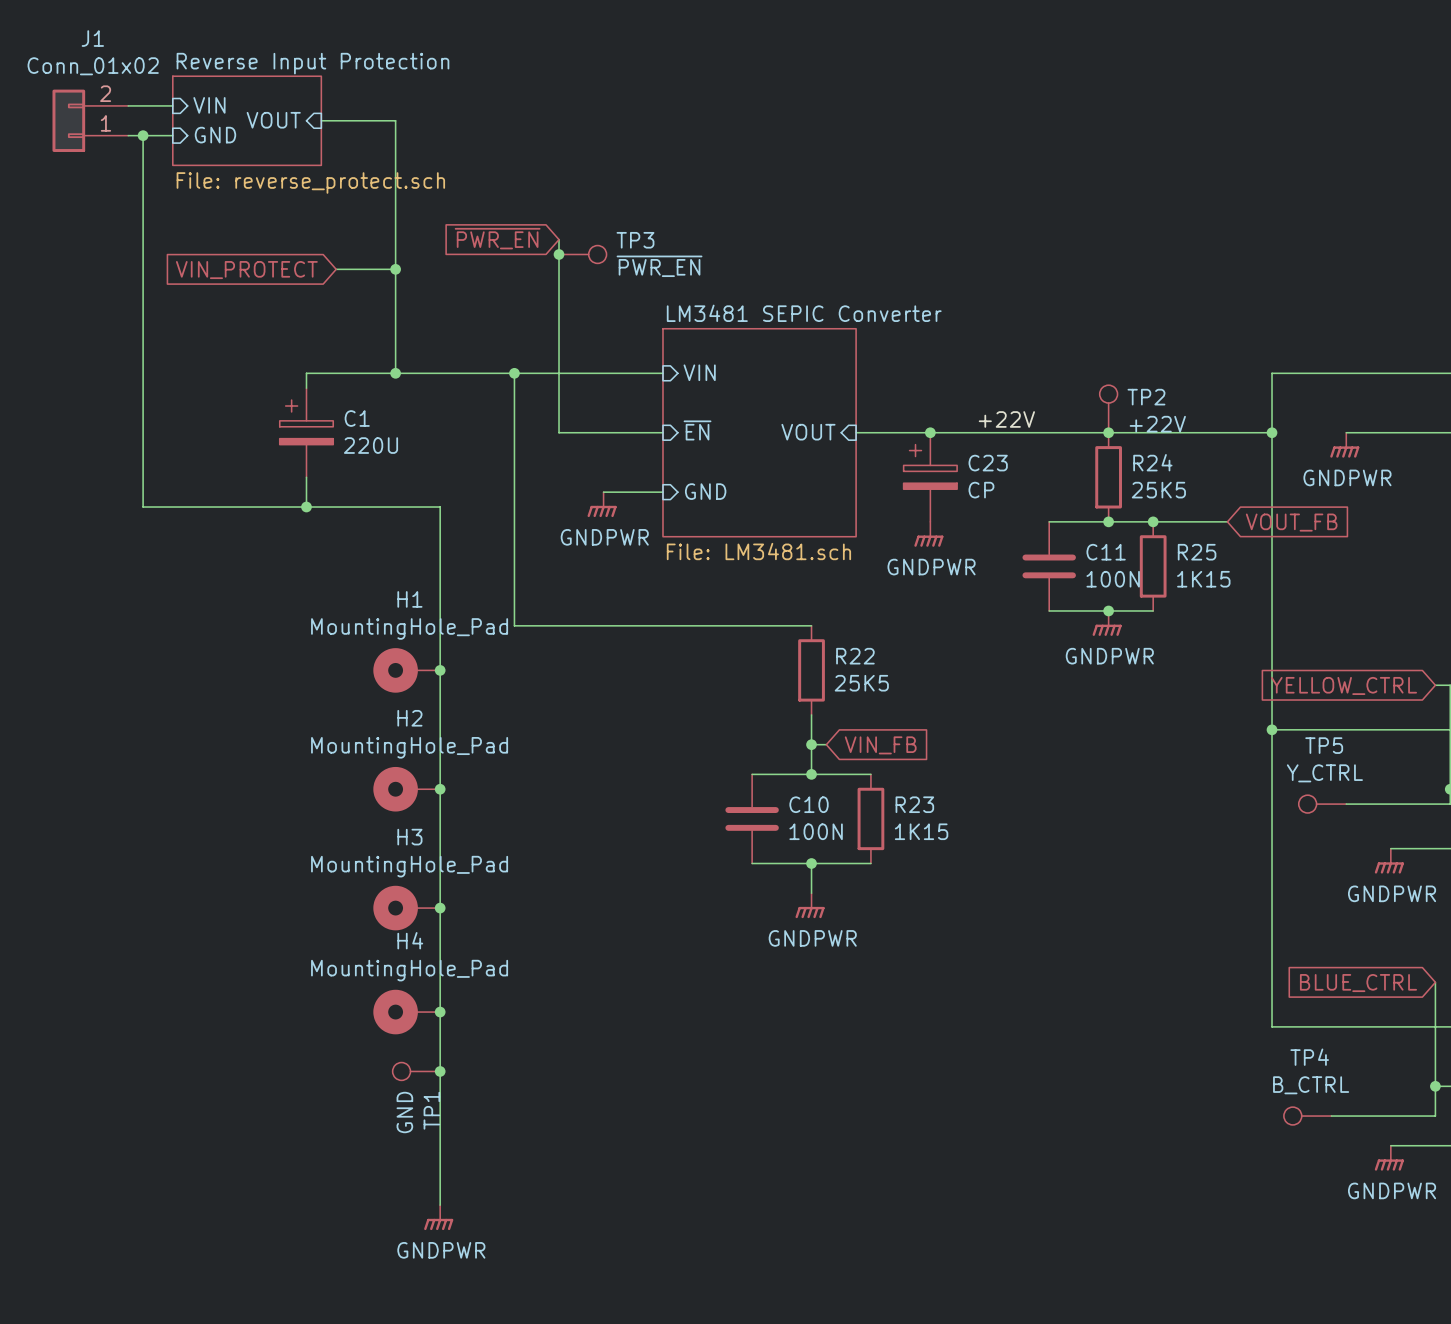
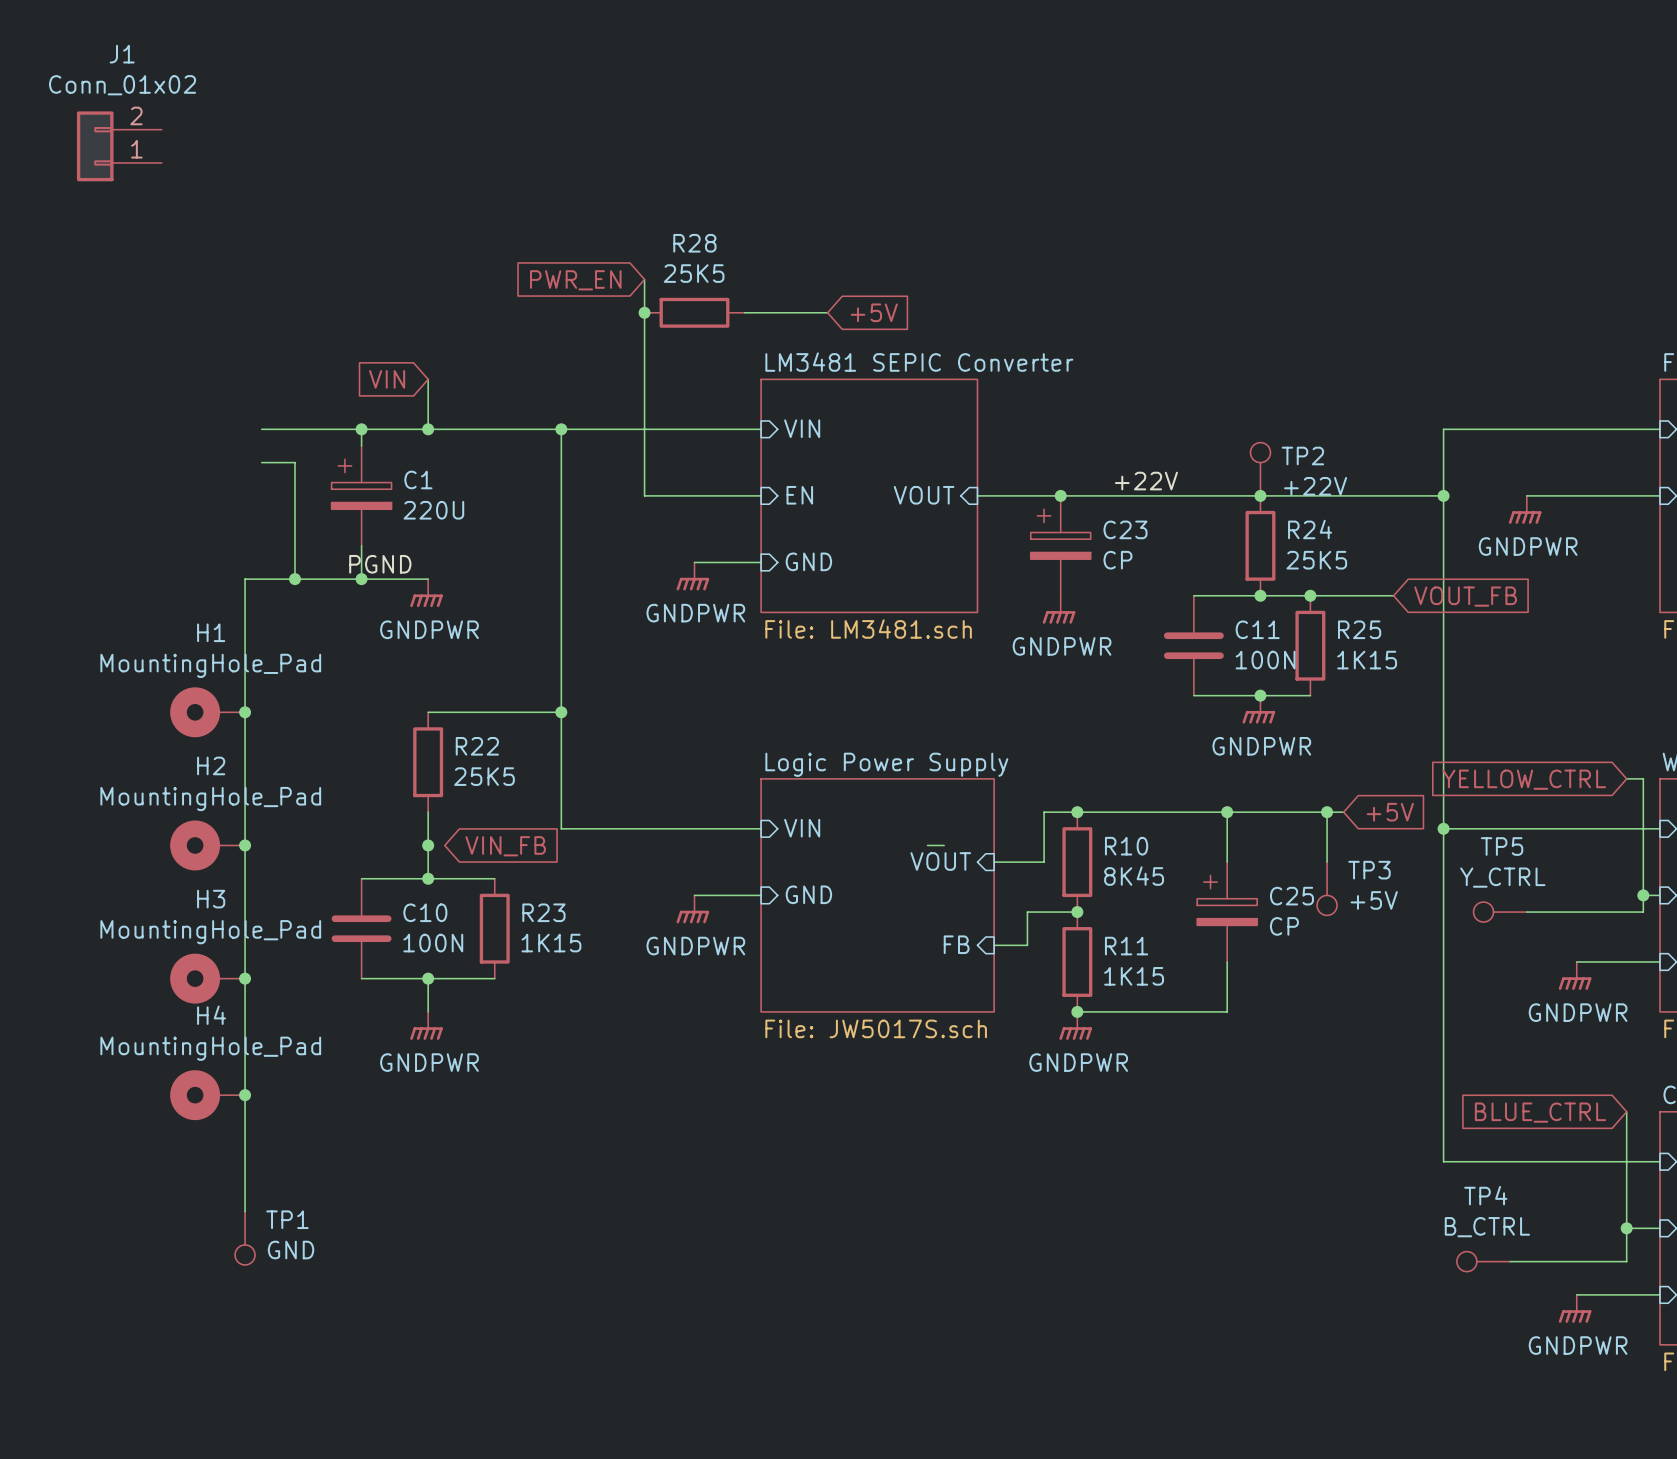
wire: (128, 105) (172, 105) -> none
sheet pin: VIN (209, 105) -> none
sheet Reverse Input Protection: File: reverse_protect.sch (247, 120) -> none
sheet pin: VOUT (273, 120) -> none
wire: (321, 120) (395, 120) (395, 373) -> none
wire: (128, 135) (172, 135) -> none
wire: (143, 135) (143, 507) (202, 507) -> (245, 1211) (245, 579)
junction: (143, 135) -> none
sheet pin: GND (215, 135) -> none
global label: ~{PWR_EN} (497, 238) -> PWR_EN (575, 280)
junction position: (559, 254) -> (644, 312)
TP3 position: (582, 254) -> (1327, 888)
TP3 rotation: 0° (597, 254) -> 90° clockwise (1327, 905)
TP3 value: ~{PWR_EN} (659, 266) -> +5V (1374, 900)
wire: (336, 269) (395, 269) -> none
junction: (395, 269) -> none
R28: none -> 25K5 (694, 312)
wire: none -> (744, 312) (827, 312)
global label: none -> +5V (874, 312)
global label: VIN_PROTECT (246, 270) -> none
global label: none -> VIN (387, 379)
wire: none -> (428, 379) (428, 429)
wire: none -> (261, 429) (361, 429)
junction: none -> (361, 429)
junction position: (395, 373) -> (428, 429)
wire: none -> (561, 429) (561, 828) (761, 828)
wire: (514, 373) (514, 625) (811, 625) -> none
junction position: (514, 373) -> (561, 429)
wire: none -> (261, 462) (294, 462) (294, 579)
sheet pin: ~{EN} (697, 430) -> EN (799, 495)
label: none -> PGND (380, 564)
junction: none -> (294, 579)
wire: (365, 507) (440, 507) (440, 1205) -> none
power symbol: none -> GNDPWR (426, 593)
junction: none -> (245, 712)
wire: none -> (428, 712) (561, 712)
junction: none -> (561, 712)
H1 position: (406, 670) -> (207, 712)
junction: (440, 670) -> none
R22 position: (811, 670) -> (428, 762)
wire: none -> (428, 812) (428, 878)
wire: (811, 714) (811, 774) -> none
junction: none -> (1077, 812)
wire: none -> (1227, 812) (1227, 862)
junction: none -> (1227, 812)
wire: none -> (1327, 812) (1327, 862)
junction: none -> (1327, 812)
wire: none -> (1343, 812) (1044, 812) (1044, 862) (994, 862)
global label: none -> +5V (1390, 812)
sheet pin: none -> VIN (802, 828)
junction: none -> (245, 845)
junction: none -> (428, 845)
junction: (811, 744) -> none
global label: none -> VIN_FB (505, 846)
global label: VIN_FB (880, 745) -> none
sheet pin: none -> VOUT (940, 861)
R10: none -> 8K45 (1077, 862)
wire: none -> (361, 878) (494, 878)
junction: none -> (428, 878)
wire: (752, 774) (870, 774) -> none
junction: (811, 774) -> none
sheet pin: none -> GND (808, 894)
H2 position: (406, 789) -> (207, 845)
junction: (440, 789) -> none
wire: none -> (694, 895) (761, 895)
sheet Logic Power Supply: none -> File: JW5017S.sch (877, 895)
power symbol: none -> GNDPWR (692, 909)
wire: none -> (1077, 912) (1027, 912) (1027, 945) (994, 945)
junction: none -> (1077, 912)
C25: none -> CP (1227, 912)
C10 position: (752, 818) -> (361, 928)
R23 position: (870, 818) -> (494, 928)
sheet pin: none -> FB (956, 944)
R11: none -> 1K15 (1077, 961)
wire: none -> (1227, 961) (1227, 1011) (1077, 1011)
junction: none -> (245, 978)
wire: none -> (361, 978) (494, 978)
wire: none -> (428, 978) (428, 1011)
junction: none -> (428, 978)
wire: (752, 863) (870, 863) -> none
wire: (811, 863) (811, 893) -> none
junction: (811, 863) -> none
junction: none -> (1077, 1011)
power symbol: none -> GNDPWR (426, 1025)
power symbol: GNDPWR (810, 905) -> none
power symbol: none -> GNDPWR (1075, 1025)
H3 position: (406, 908) -> (207, 978)
junction: (440, 908) -> none
junction: none -> (245, 1095)
H4 position: (406, 1012) -> (207, 1095)
junction: (440, 1012) -> none
TP1 rotation: 0° (401, 1071) -> 90° counterclockwise (245, 1254)
TP1 position: (416, 1071) -> (245, 1238)
junction: (440, 1071) -> none
power symbol: GNDPWR (438, 1217) -> none

